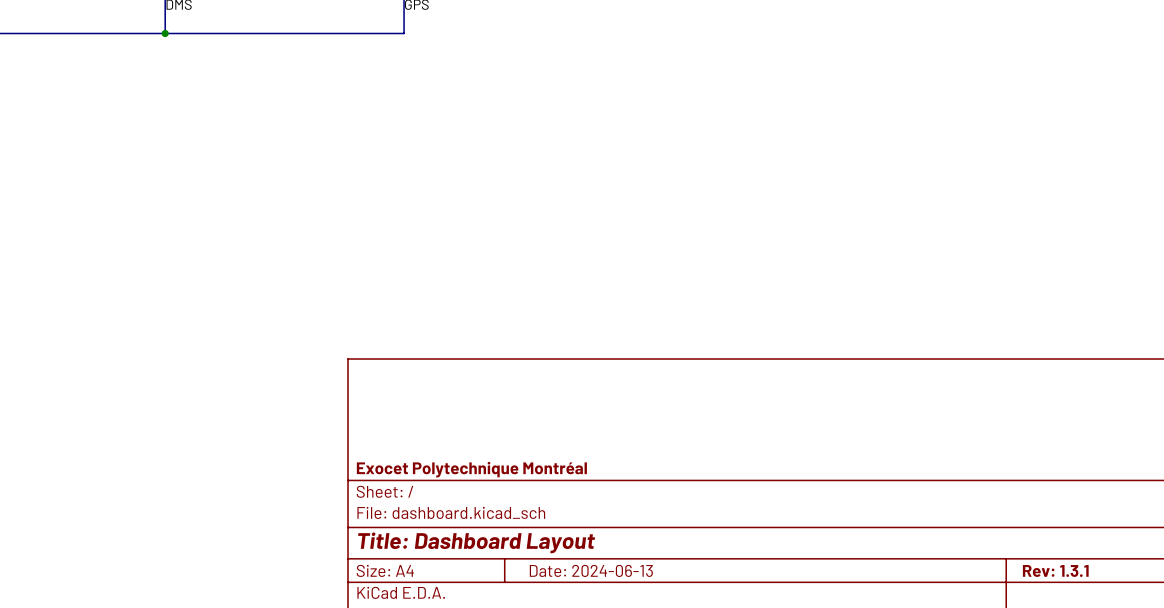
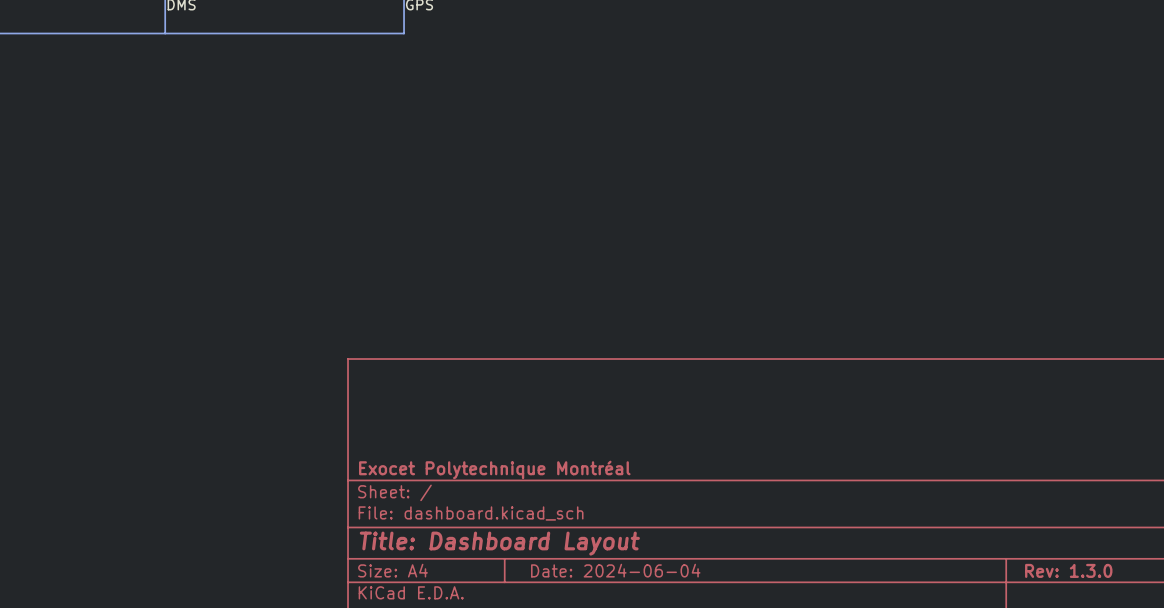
junction: (165, 33) -> none
title block: Date: 2024-06-13 (591, 570) -> Date: 2024-06-04 (615, 570)
title block: Rev: 1.3.1 (1055, 570) -> Rev: 1.3.0 (1068, 570)

